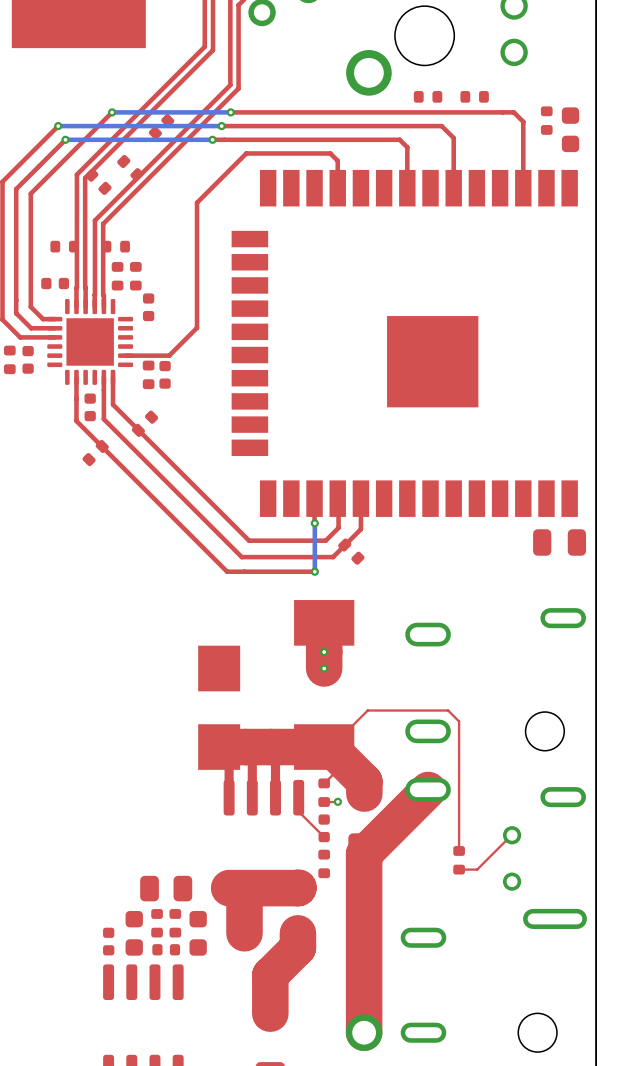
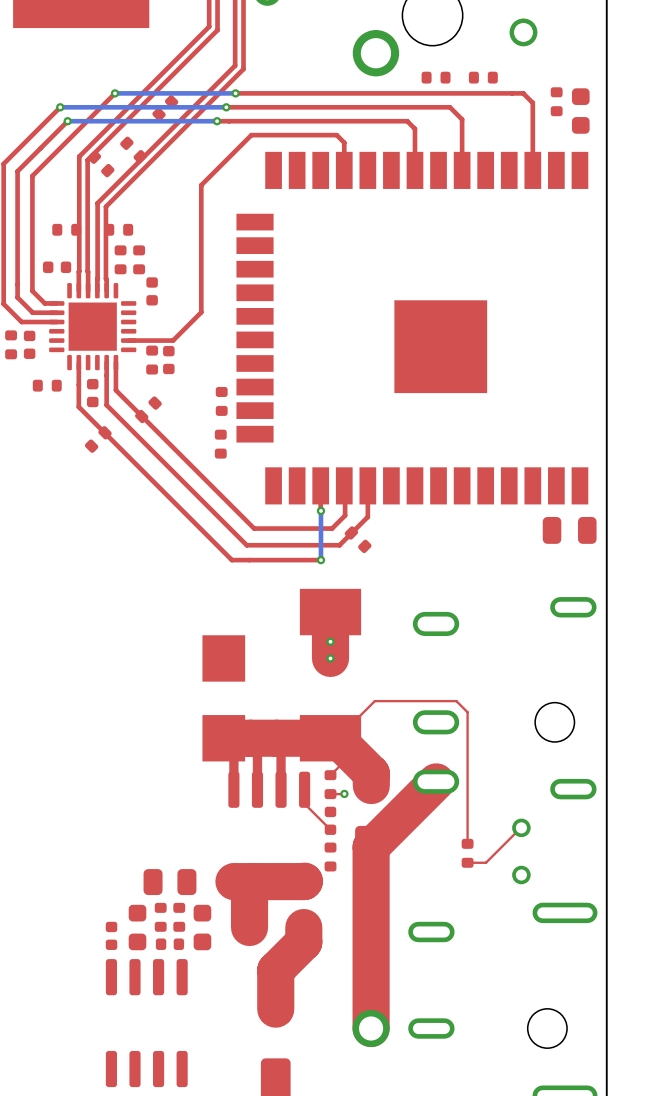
part: none -> (47, 385)
part: none -> (221, 401)
part: none -> (220, 444)

